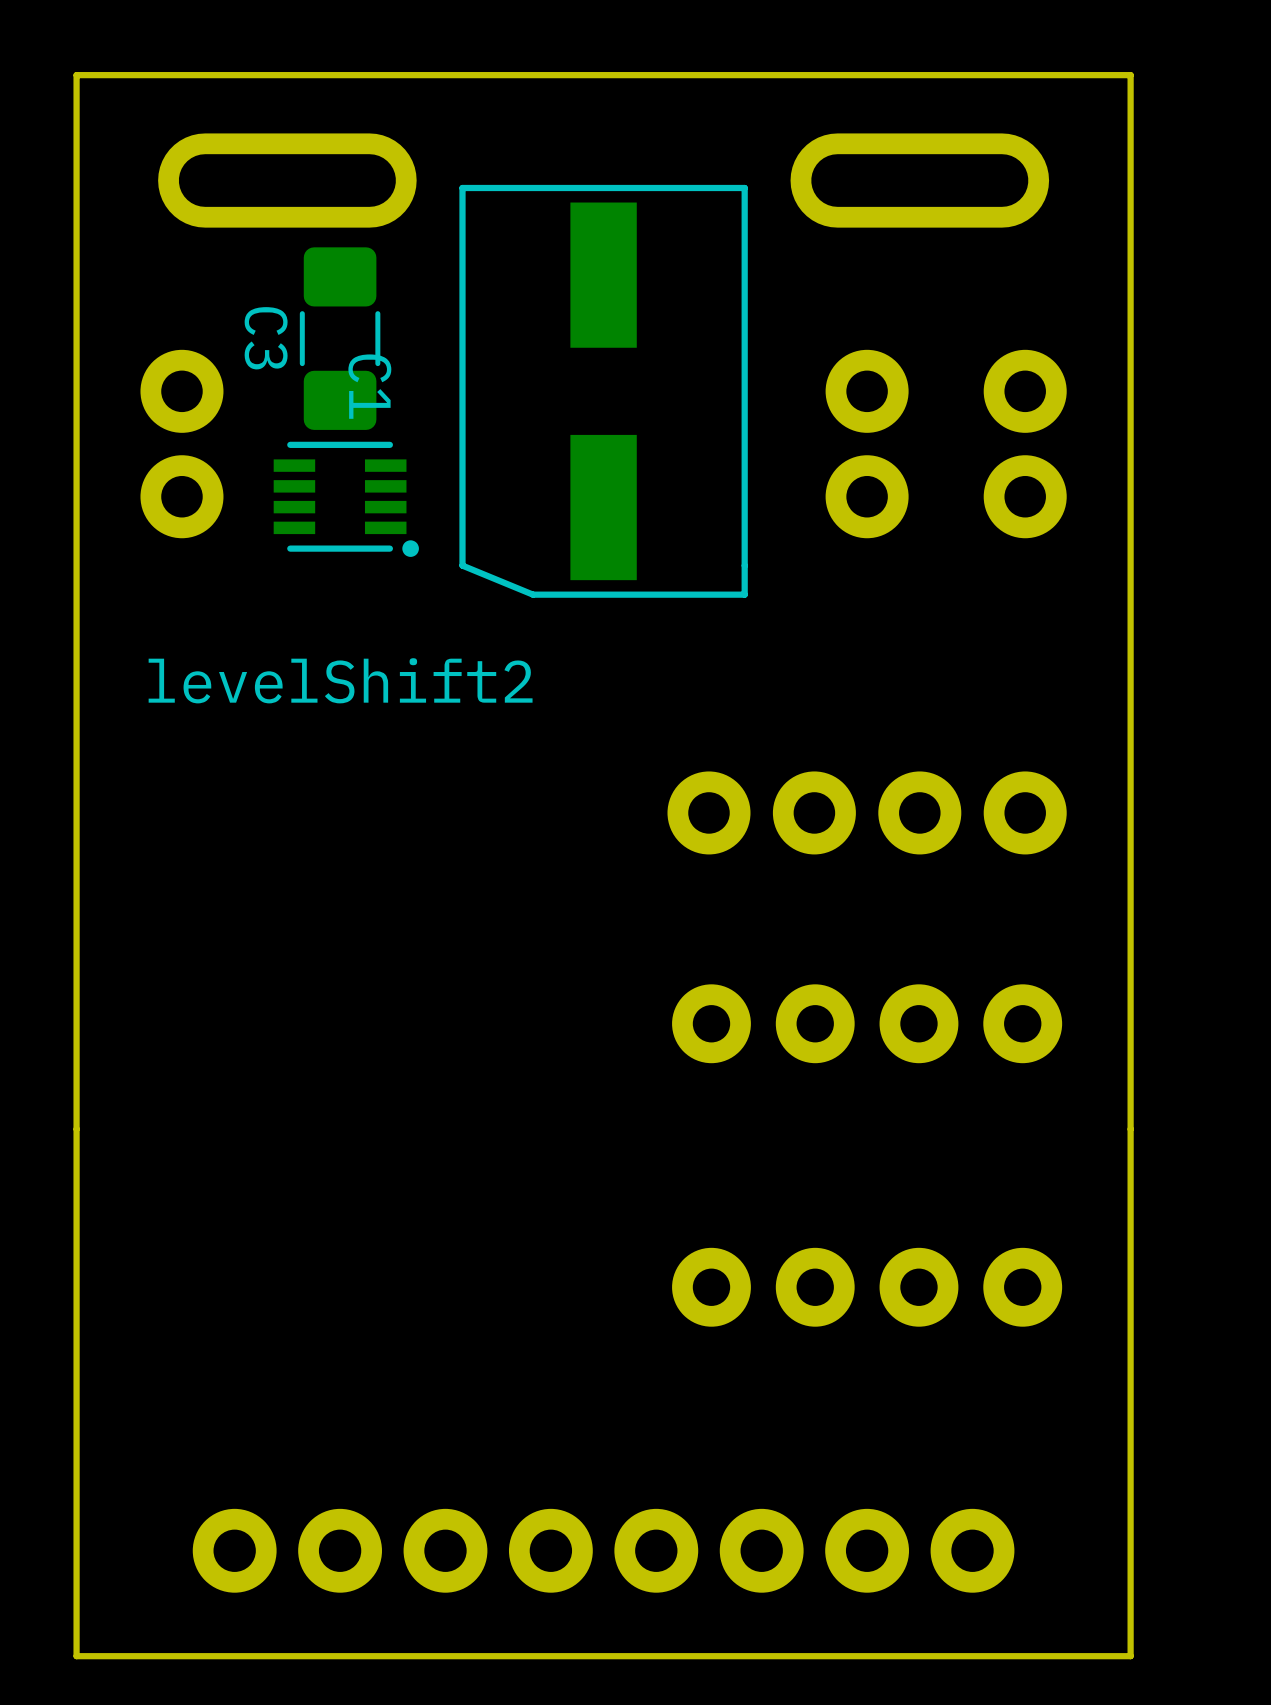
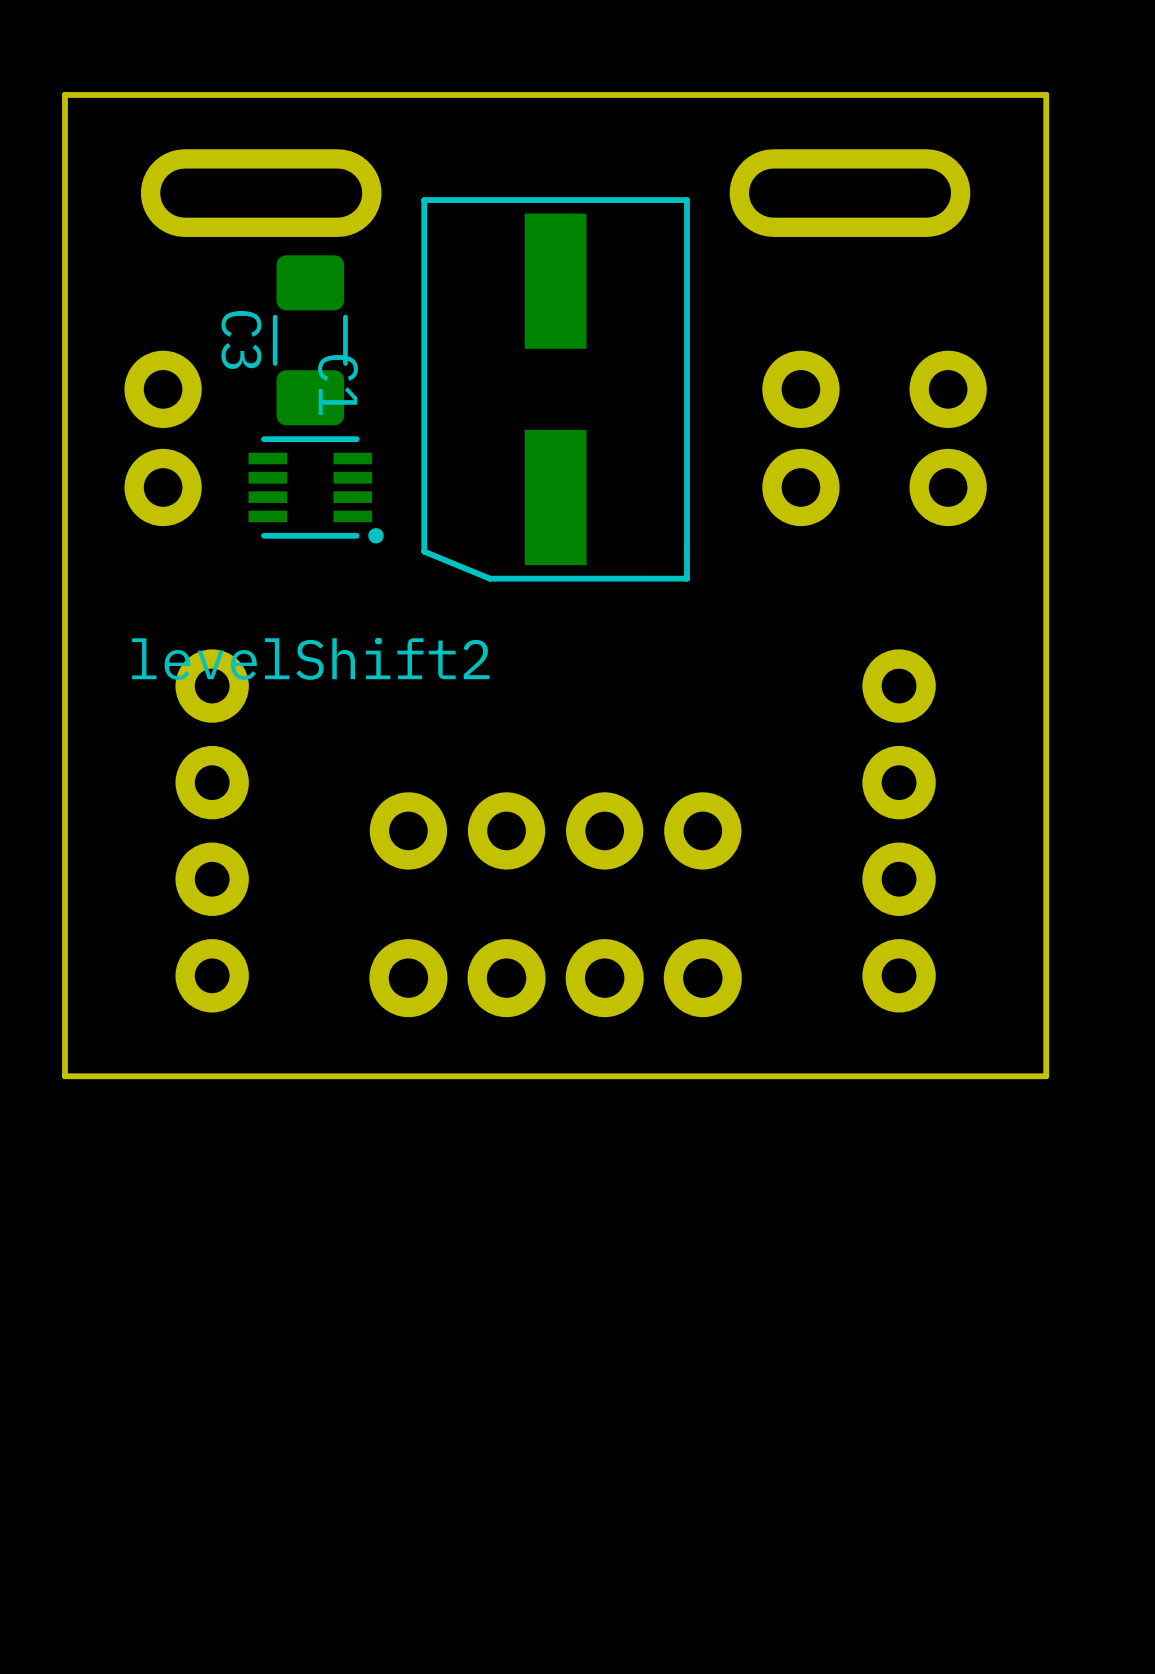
part position: (867, 812) -> (555, 830)
part: none -> (212, 830)
part: none -> (555, 978)
part rotation: 0° (867, 1023) -> 90° clockwise (899, 830)
board edge: (1130, 1129) (1130, 1656) (76, 1656) (76, 1129) -> (1046, 1076) (64, 1076)
part: (867, 1287) -> none
part: (603, 1550) -> none

